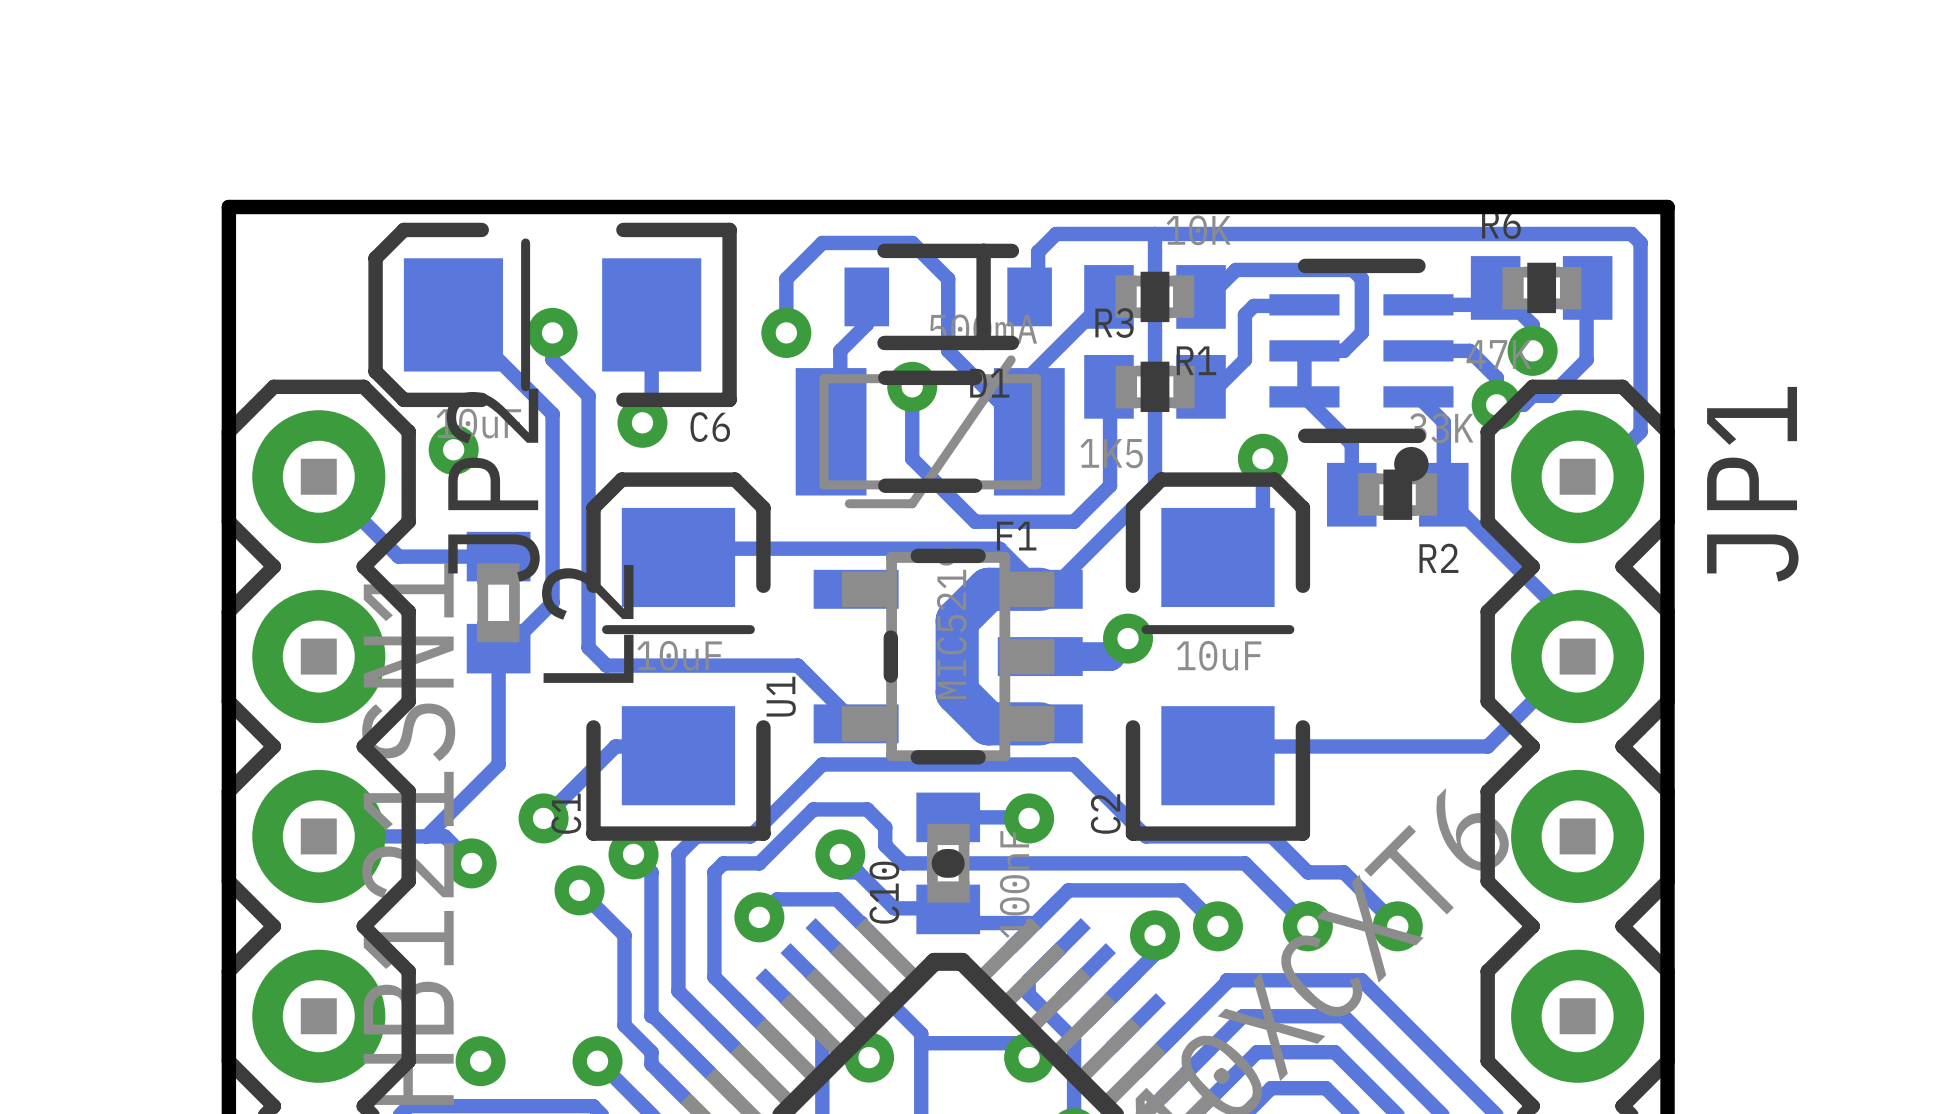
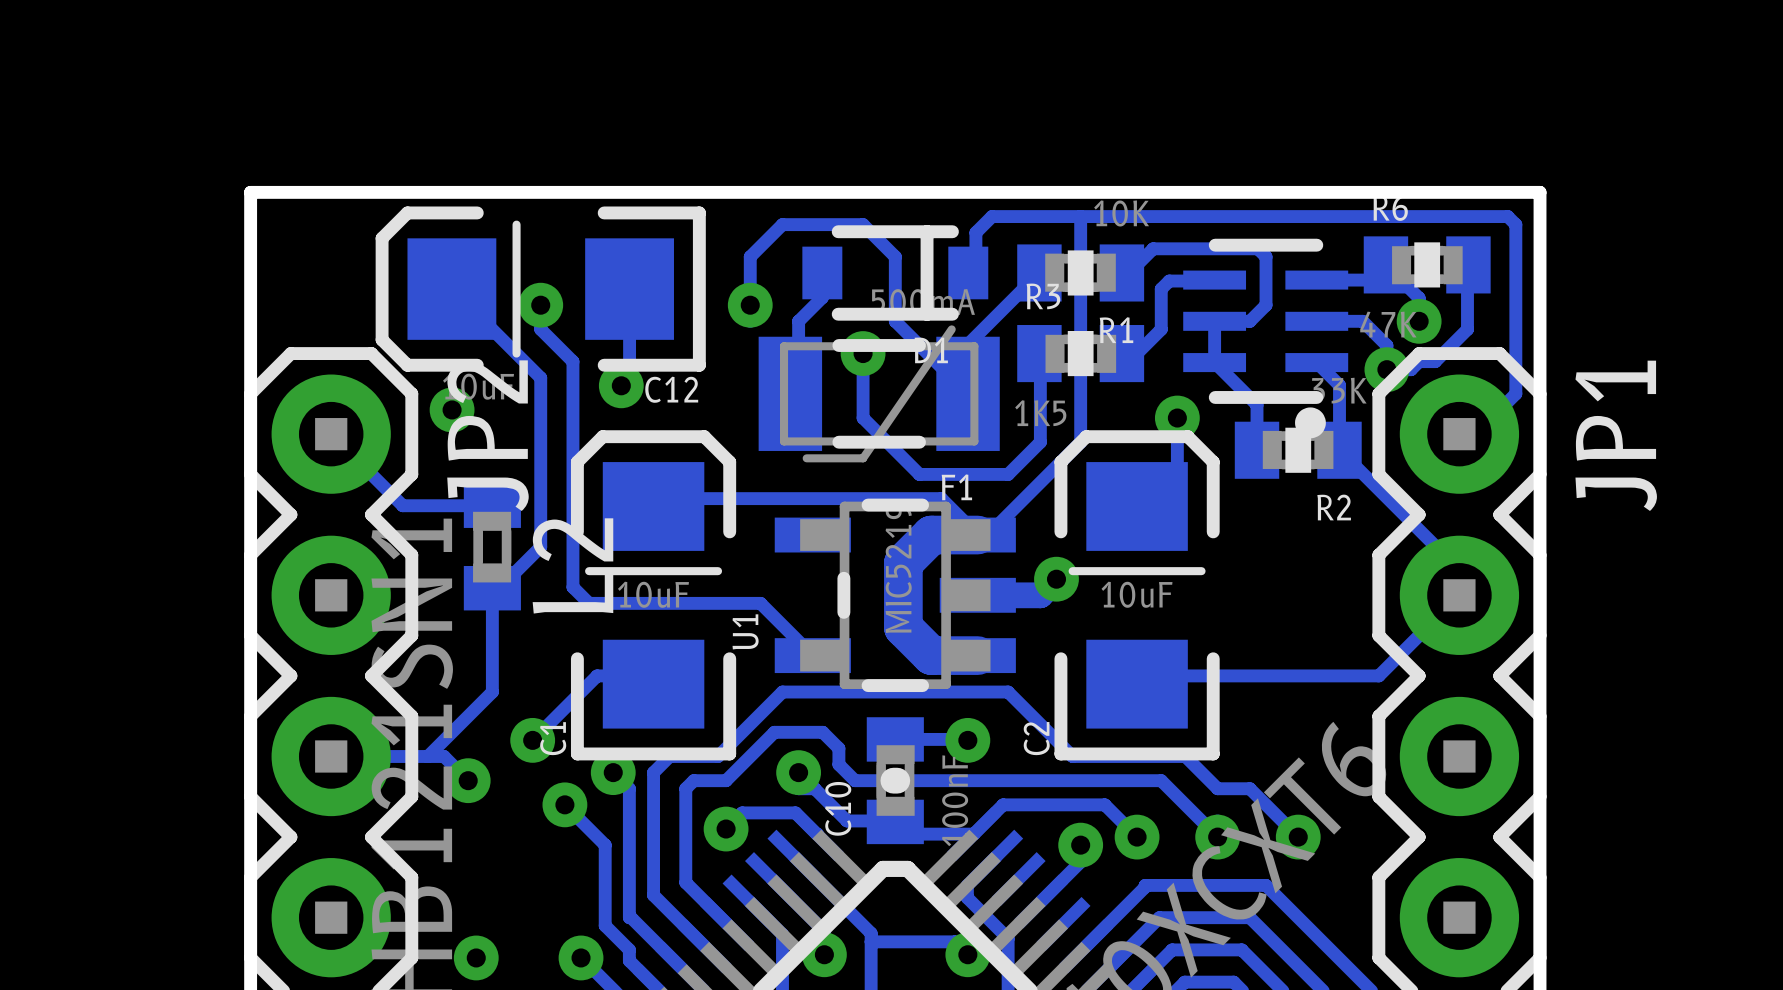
C6 name: C6 (710, 427) -> C12 (671, 389)

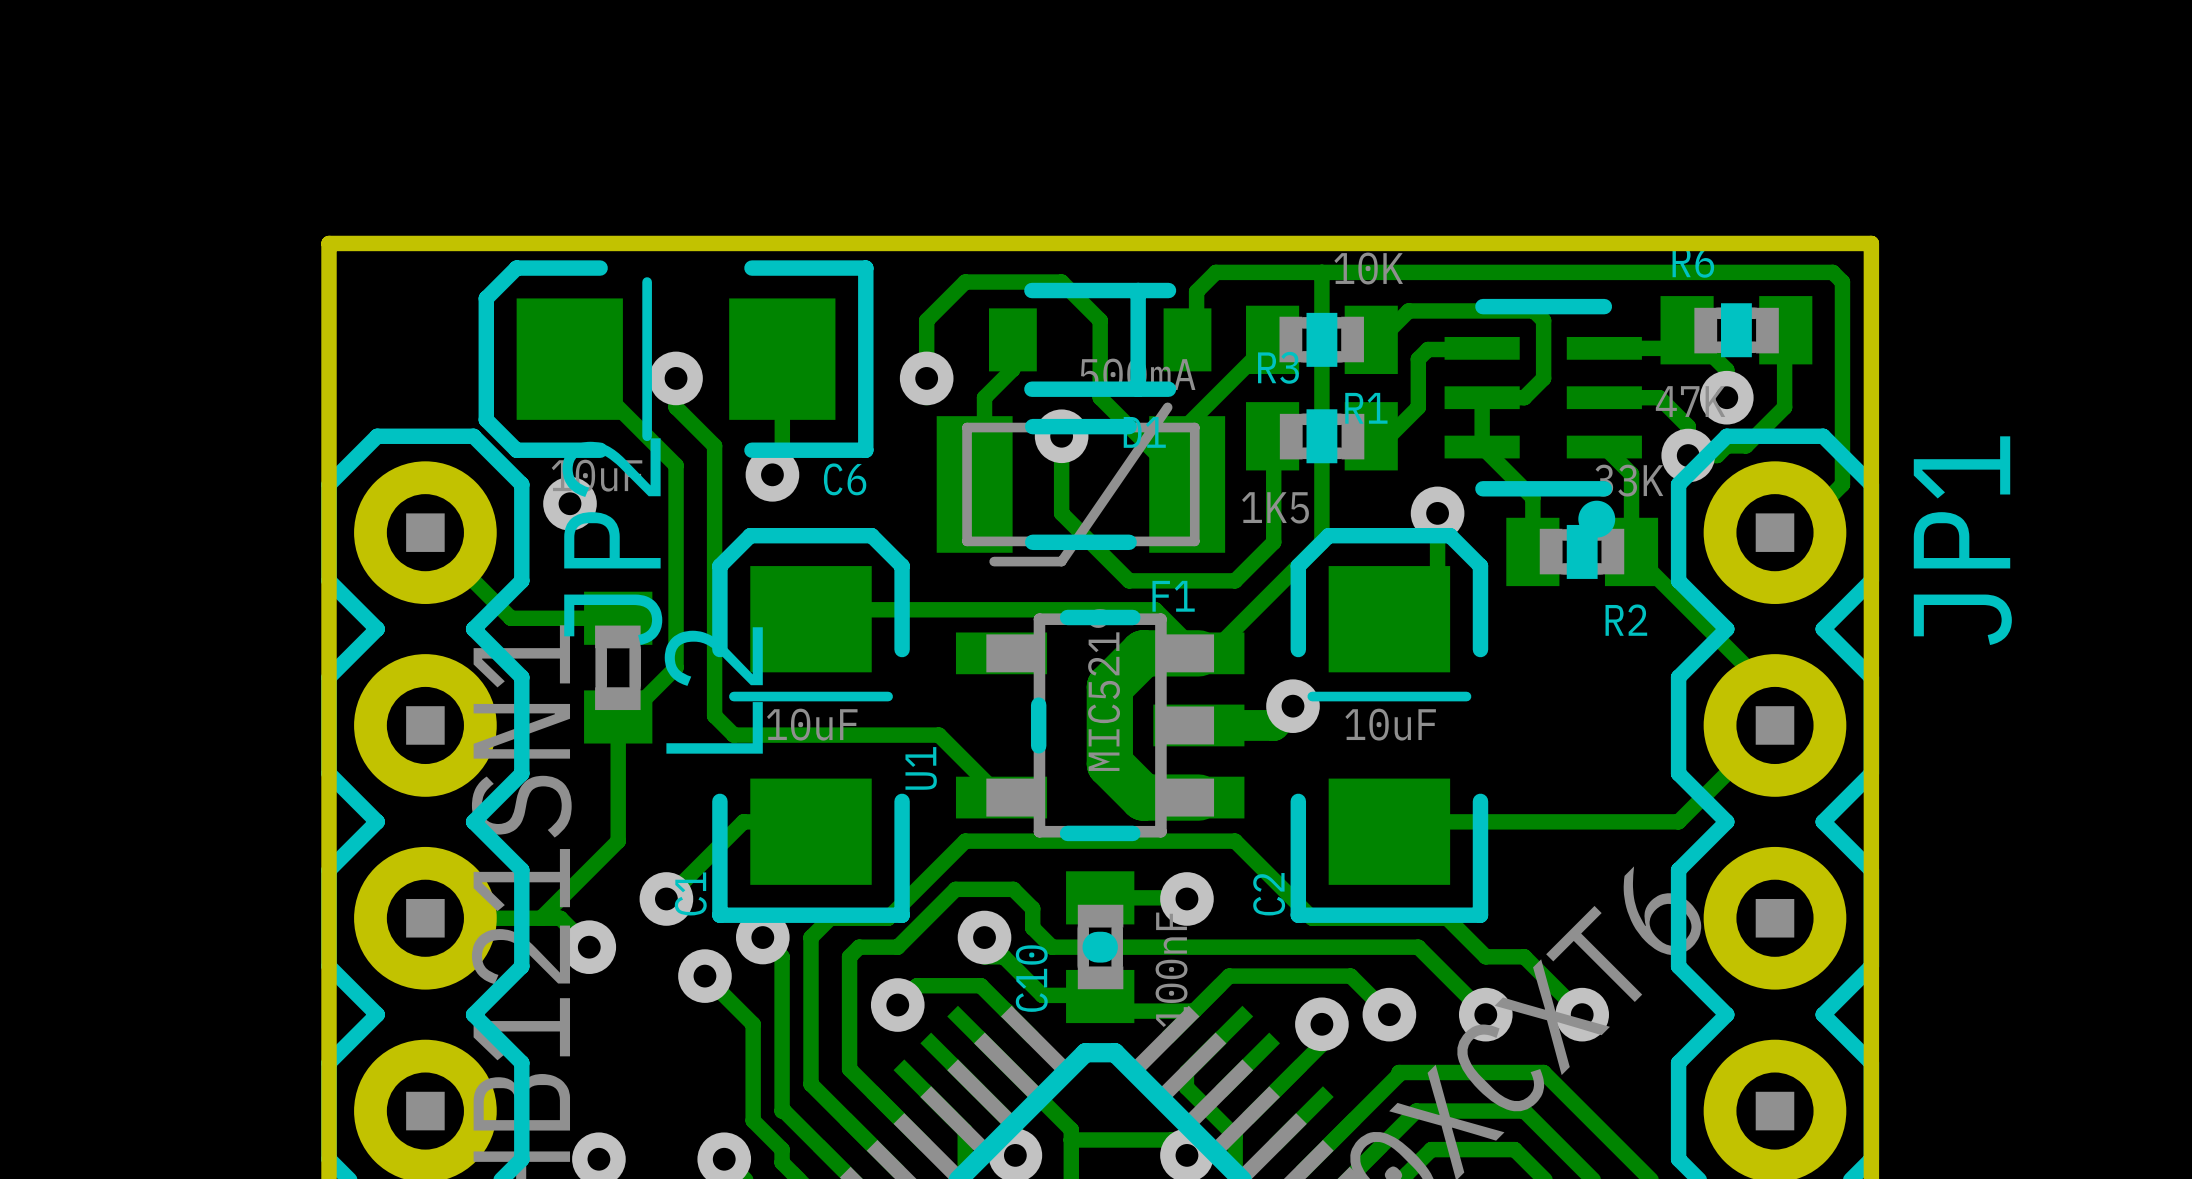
C12 name: C12 (671, 389) -> C6 (845, 479)

